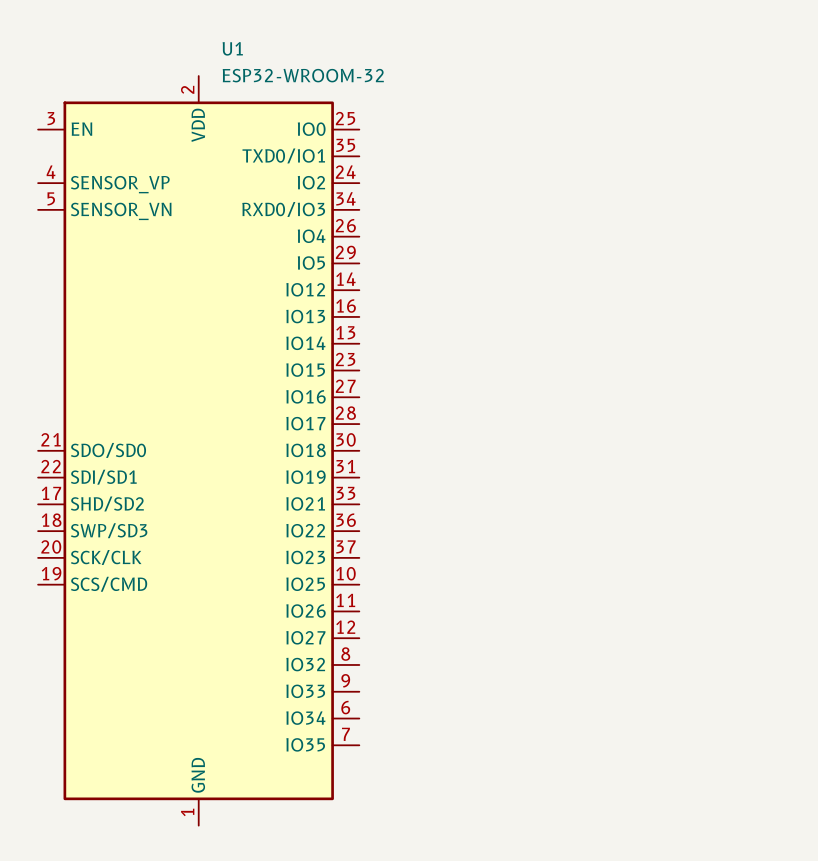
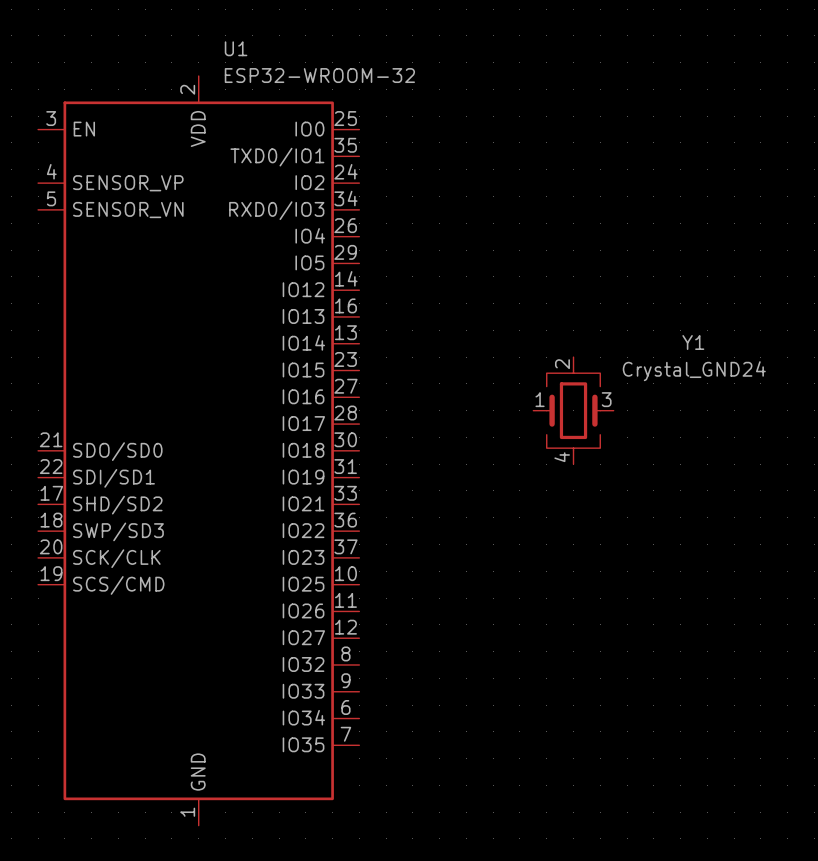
Y1: none -> Crystal_GND24 (573, 410)

